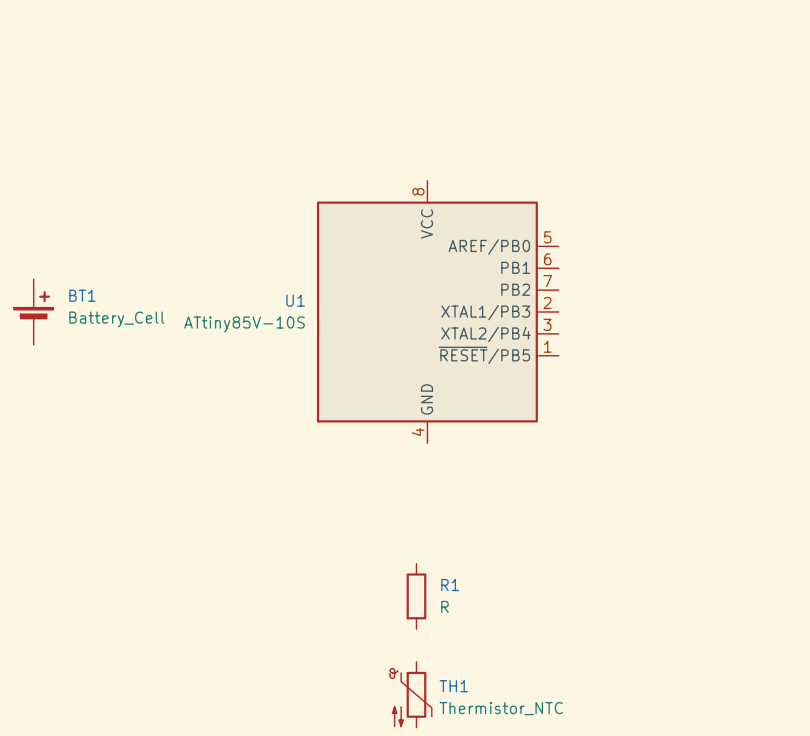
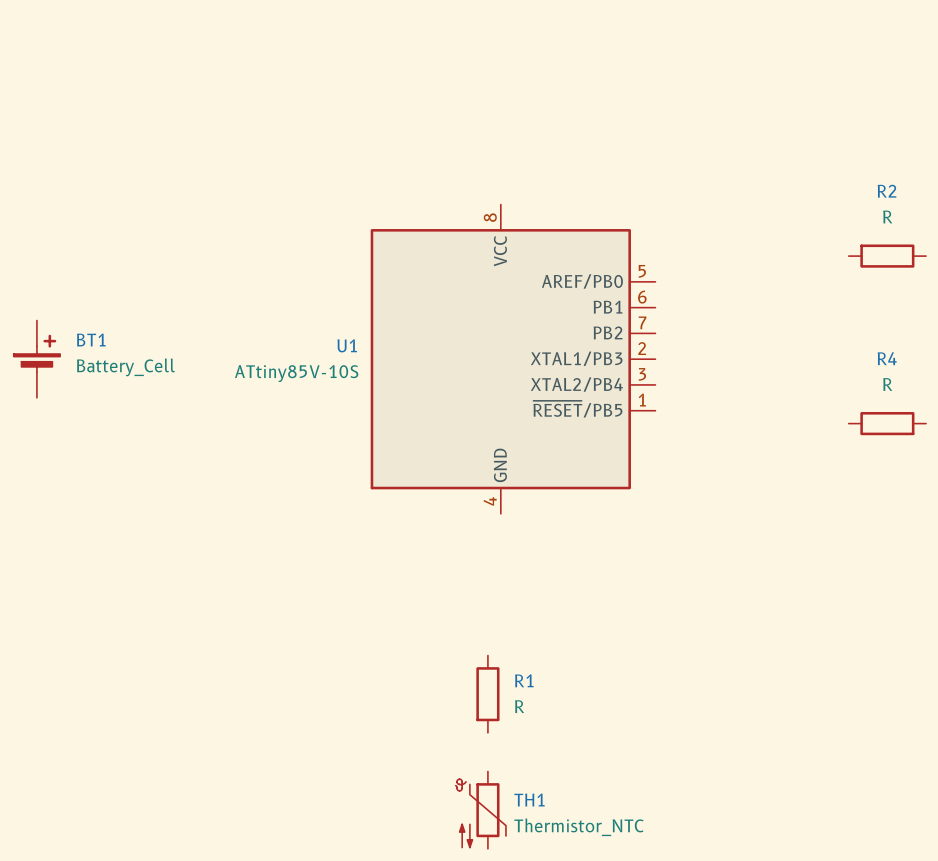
R2: none -> R (887, 256)
R4: none -> R (887, 423)

